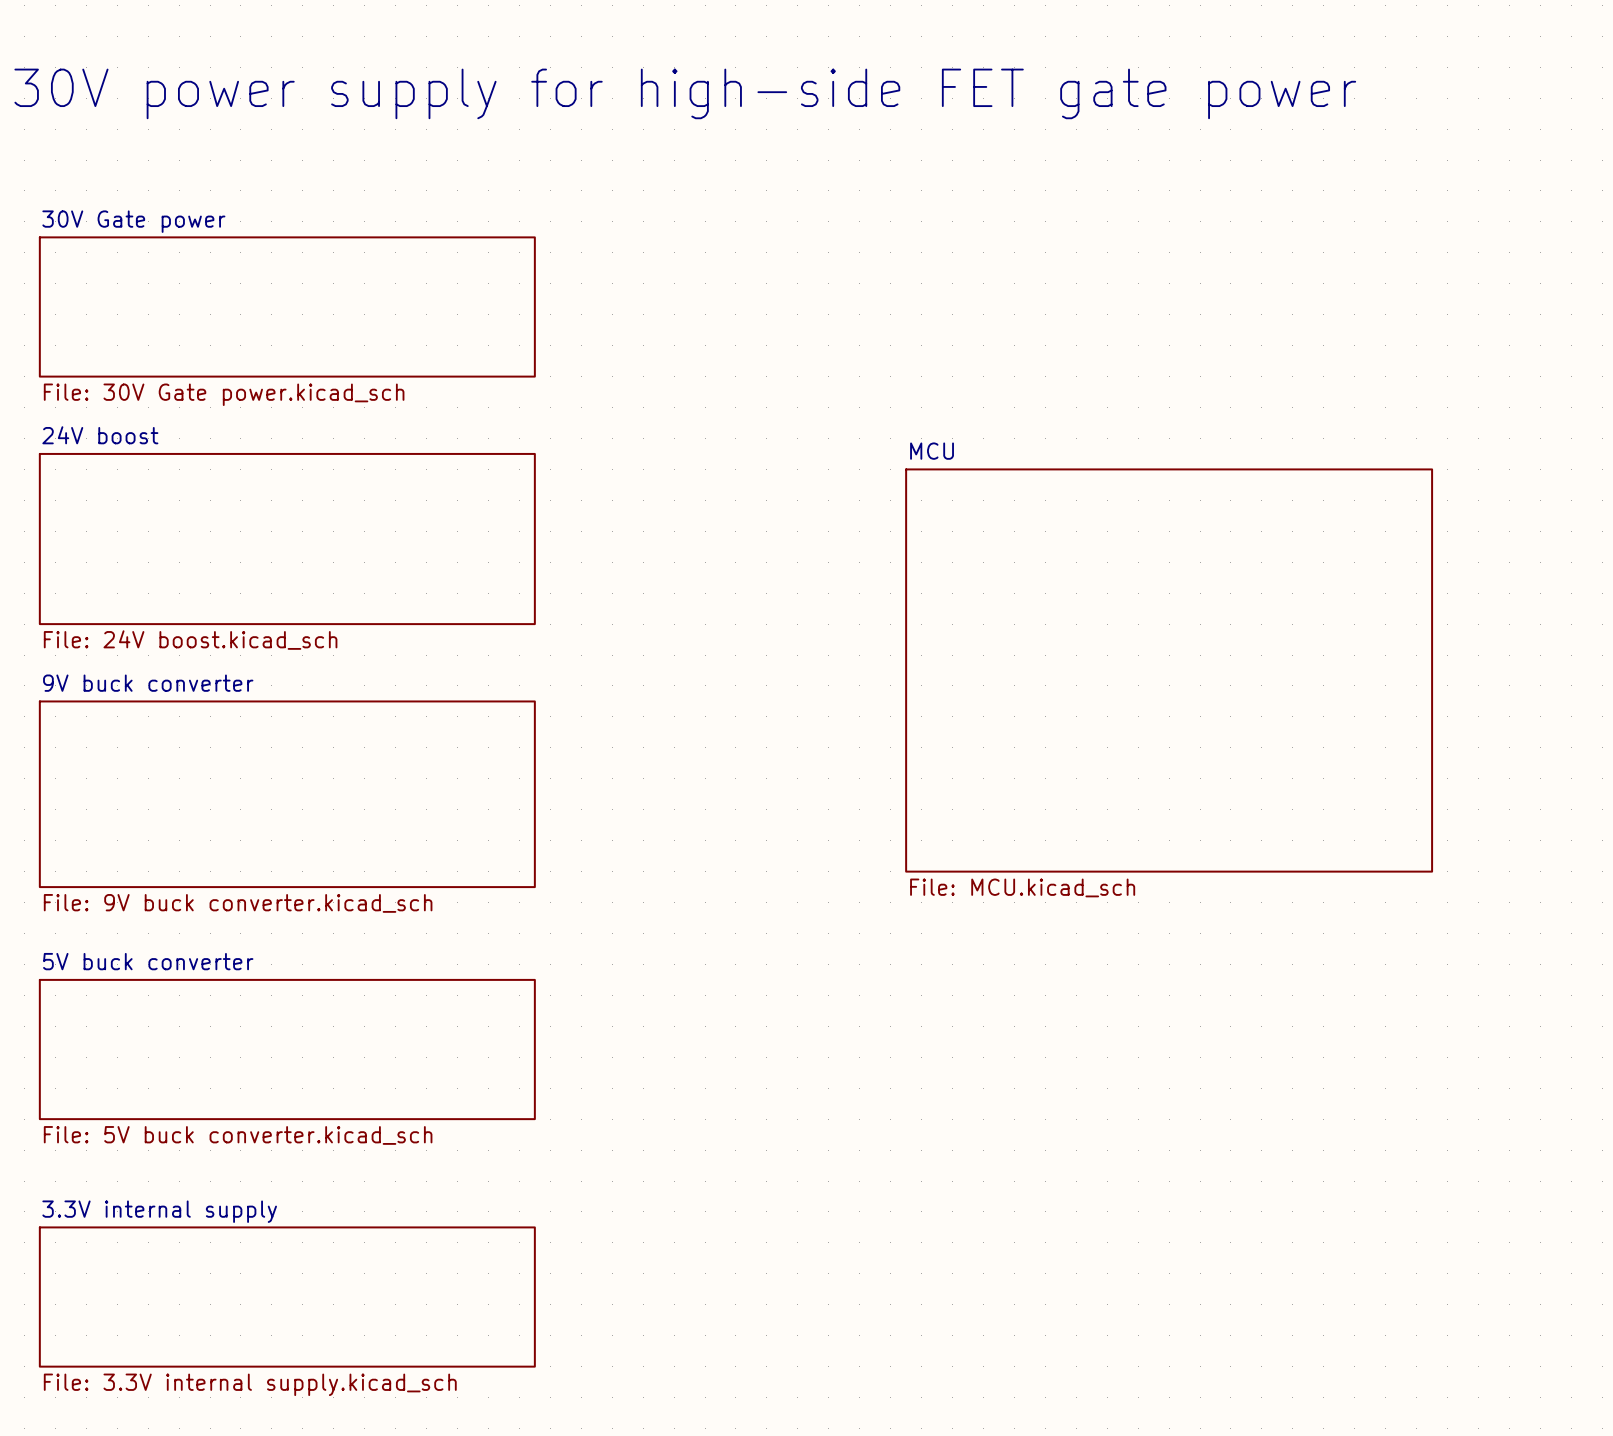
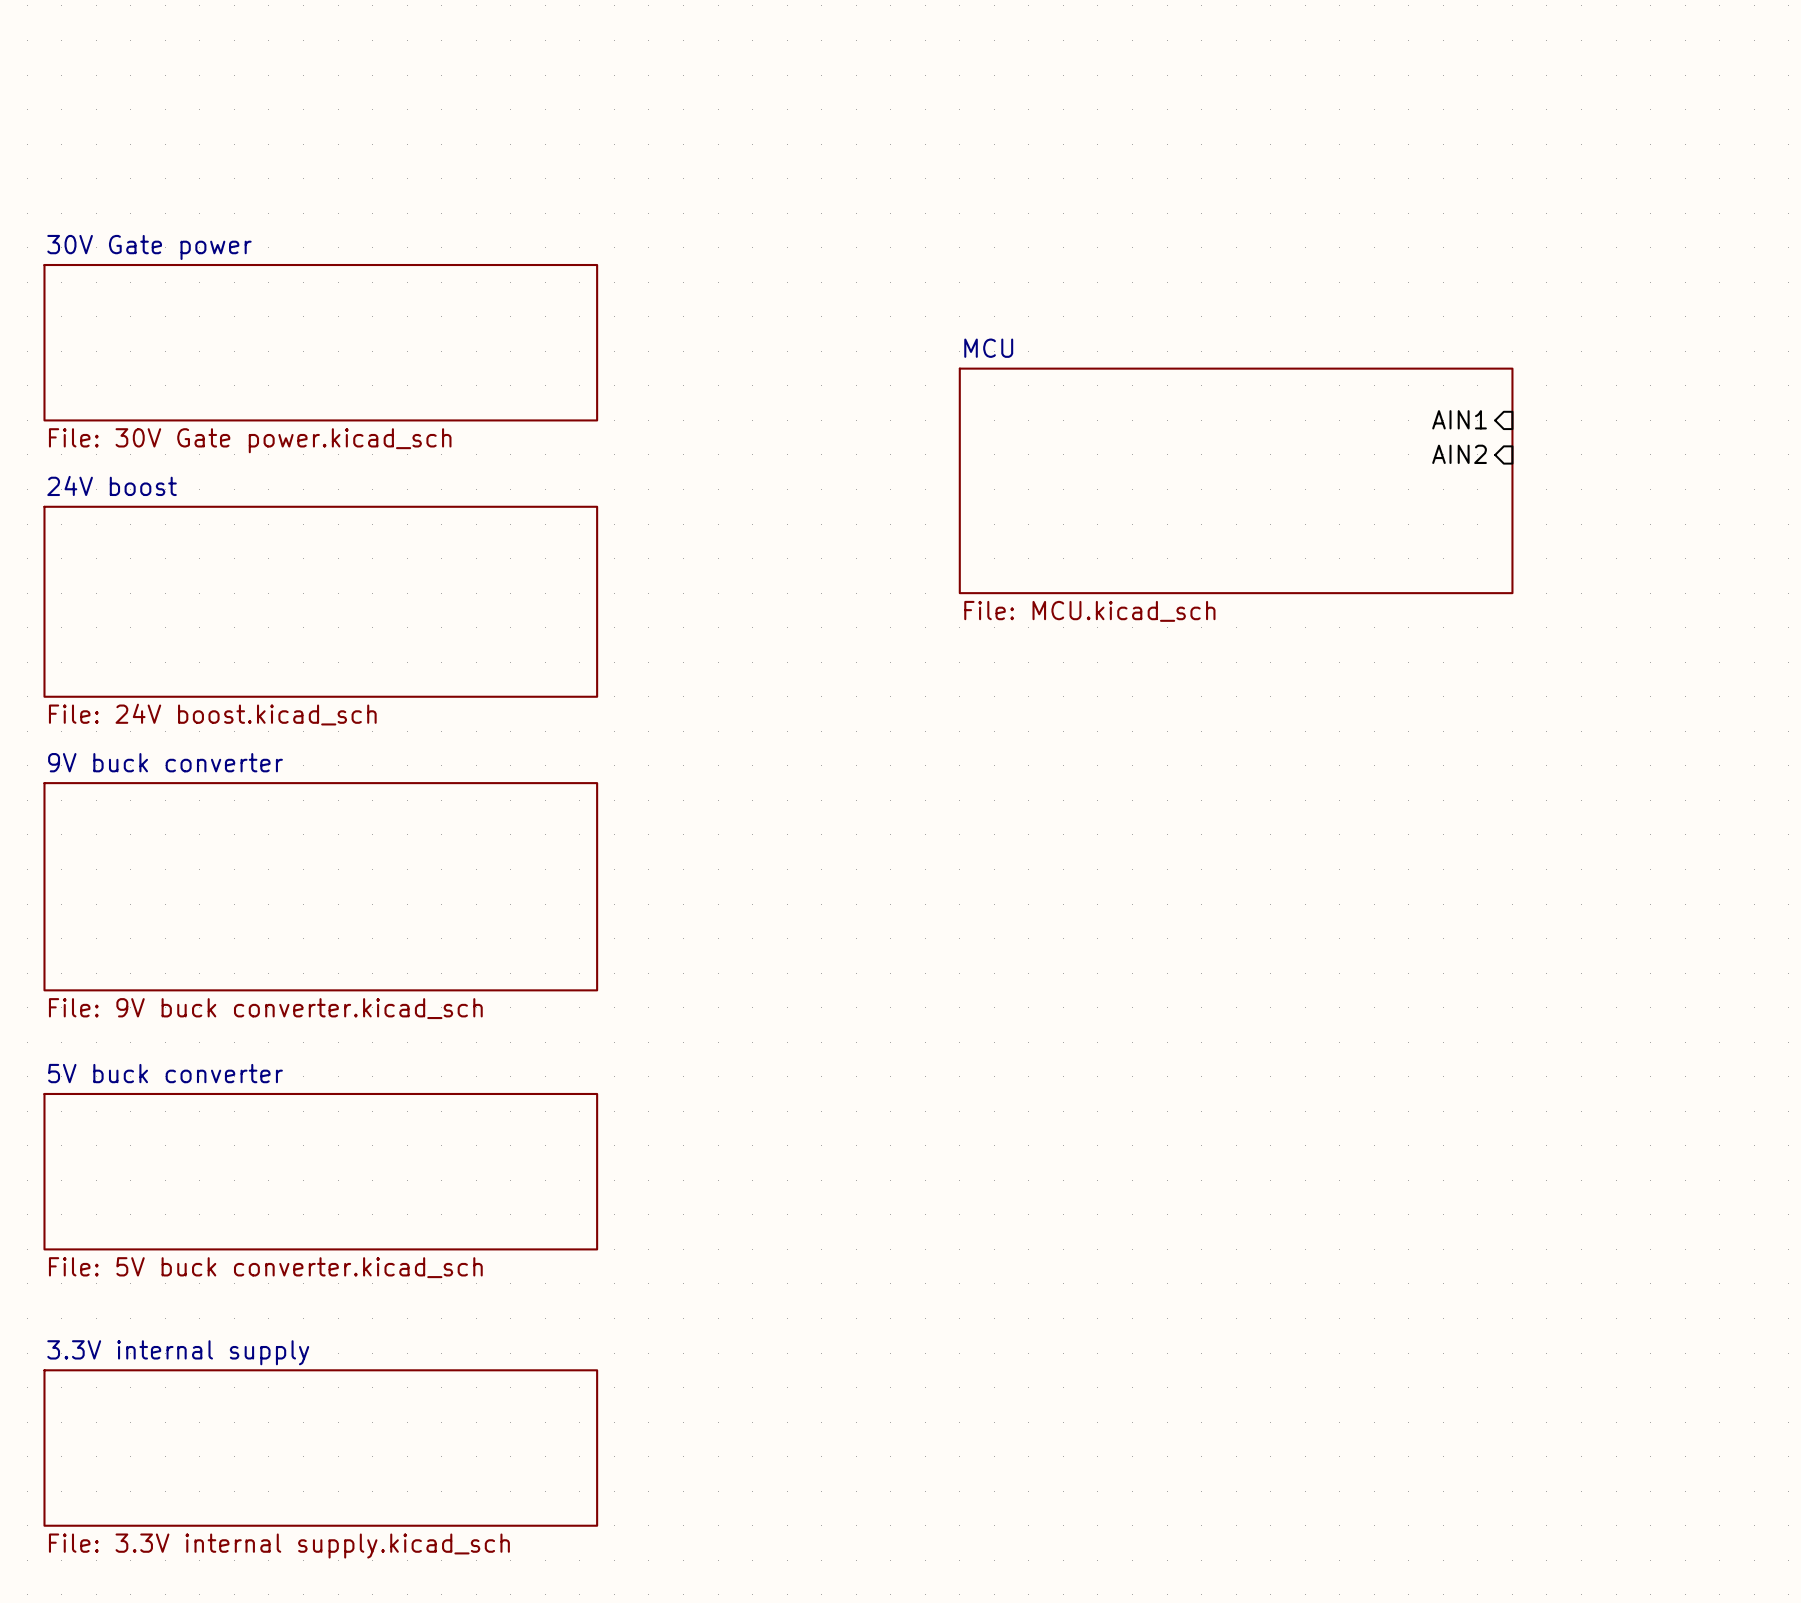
text: 30V power supply for high-side FET gate power (685, 93) -> none
sheet pin: none -> AIN1 (1459, 419)
sheet pin: none -> AIN2 (1459, 454)
sheet MCU: none -> File: MCU.kicad_sch (1236, 480)
sheet MCU: File: MCU.kicad_sch (1169, 670) -> none

